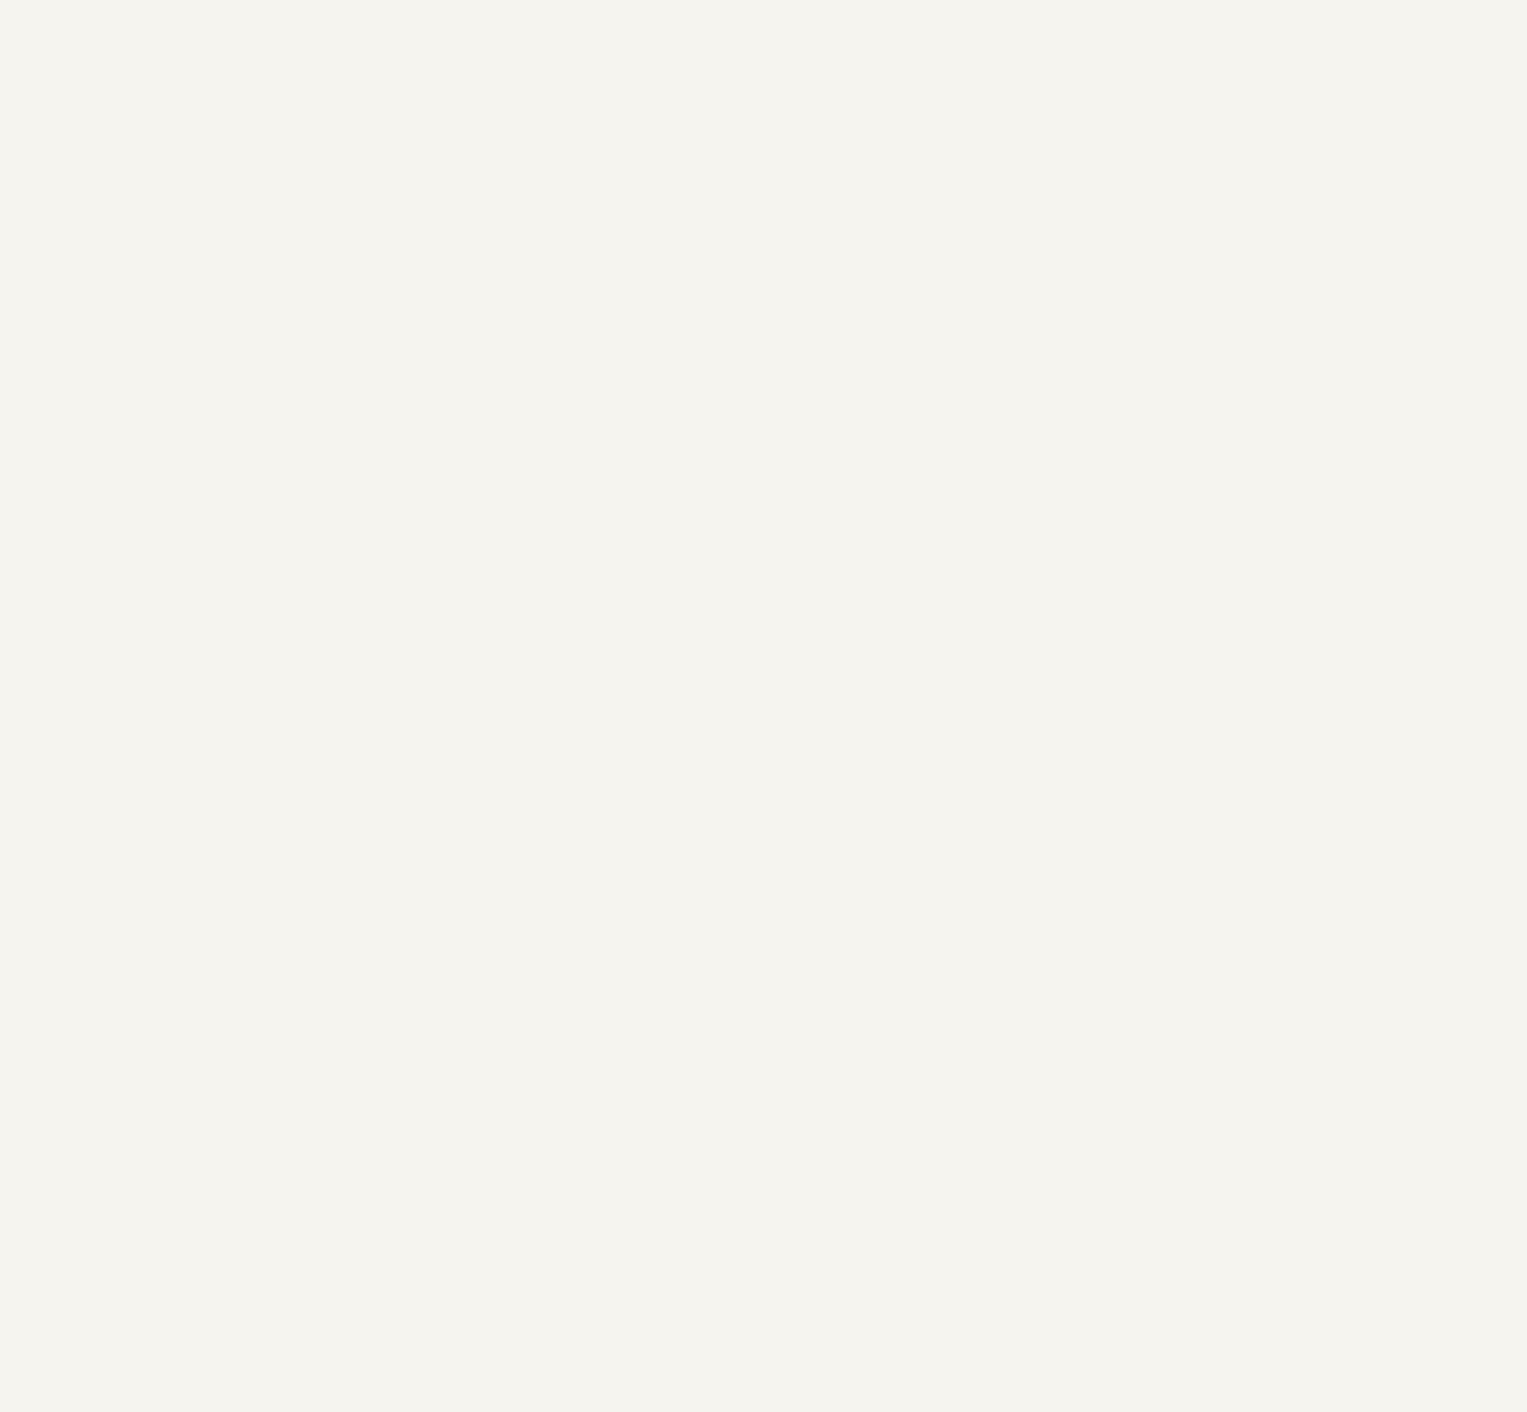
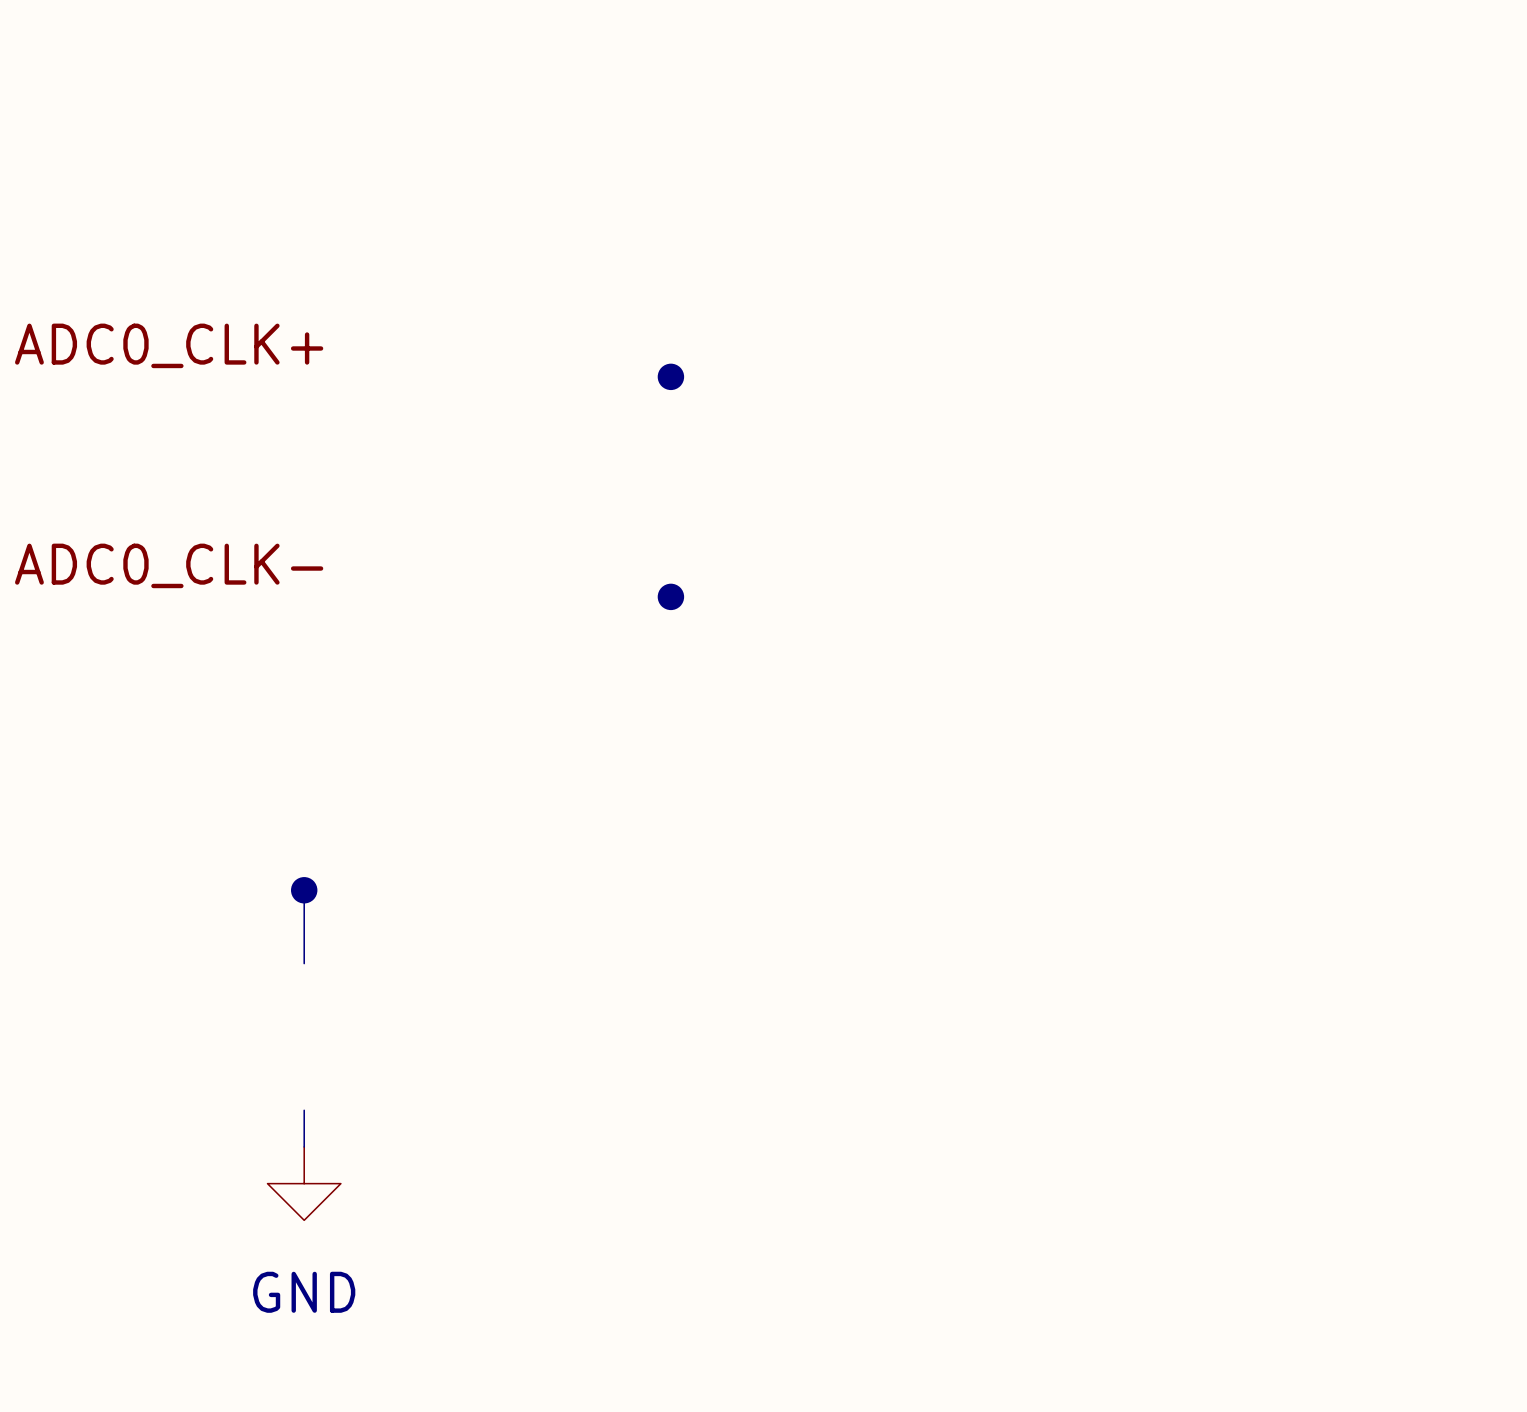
label: none -> ADC0_CLK+ (169, 345)
junction: none -> (670, 376)
label: none -> ADC0_CLK- (169, 565)
junction: none -> (670, 596)
wire: none -> (304, 890) (304, 963)
junction: none -> (304, 890)
wire: none -> (304, 1110) (304, 1146)
power symbol: none -> GND (304, 1183)

